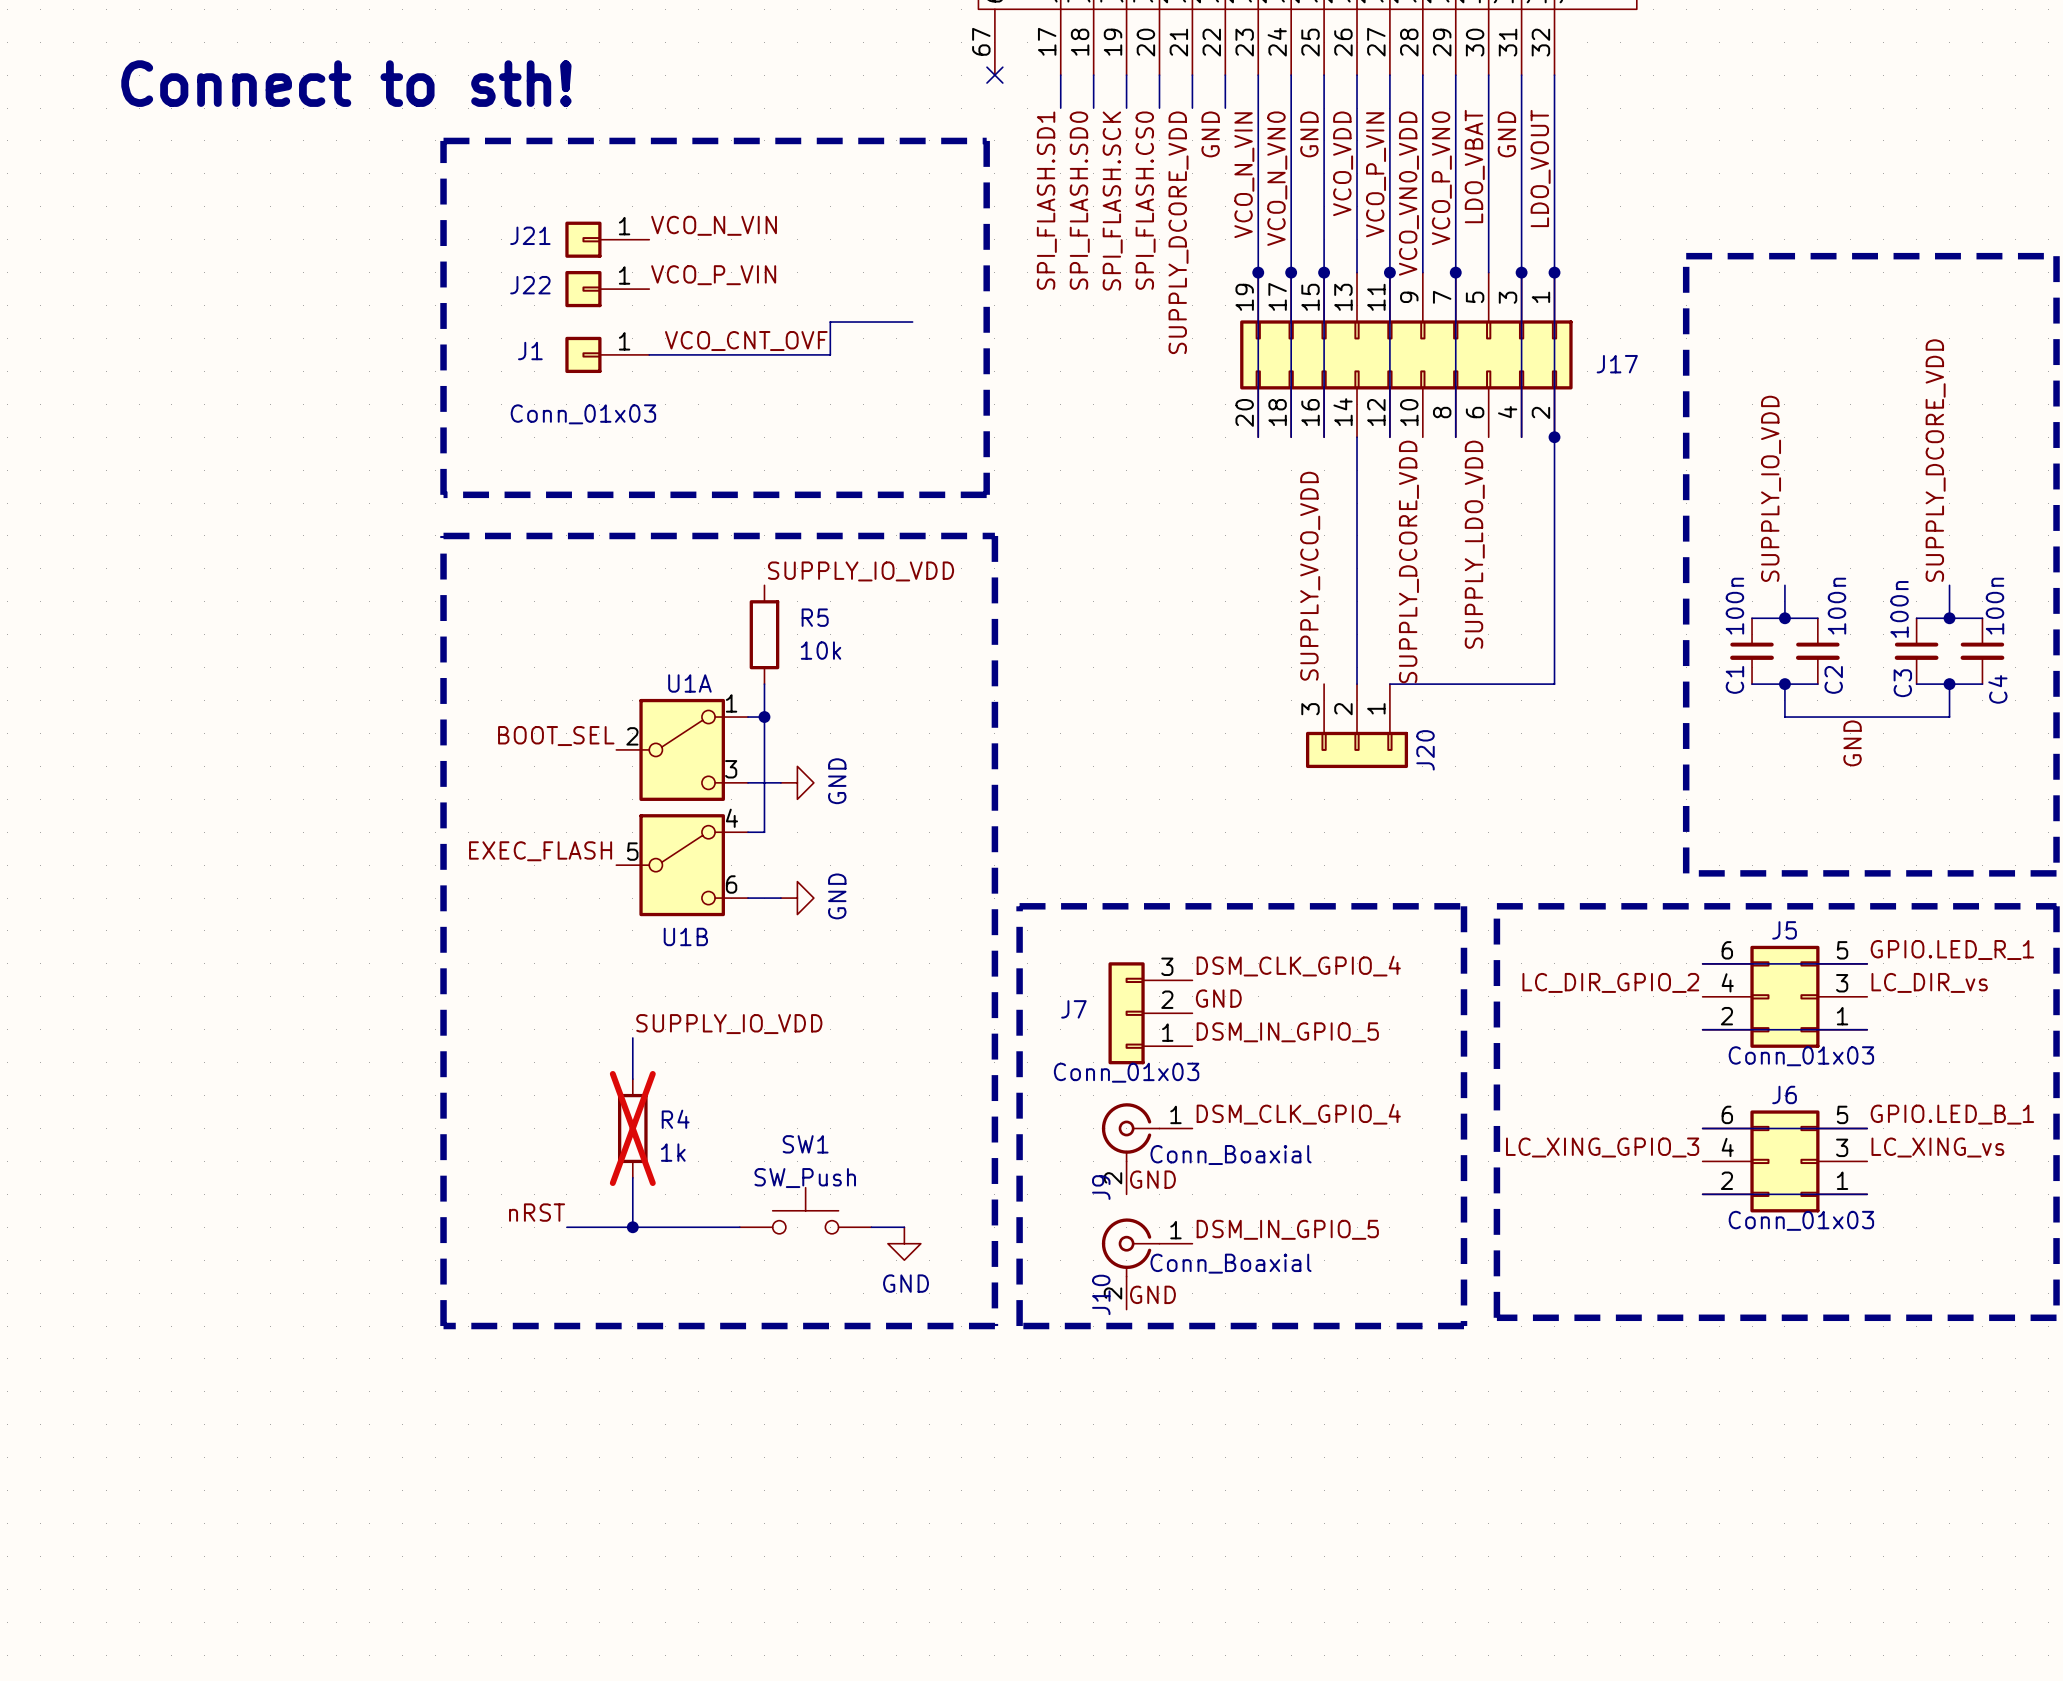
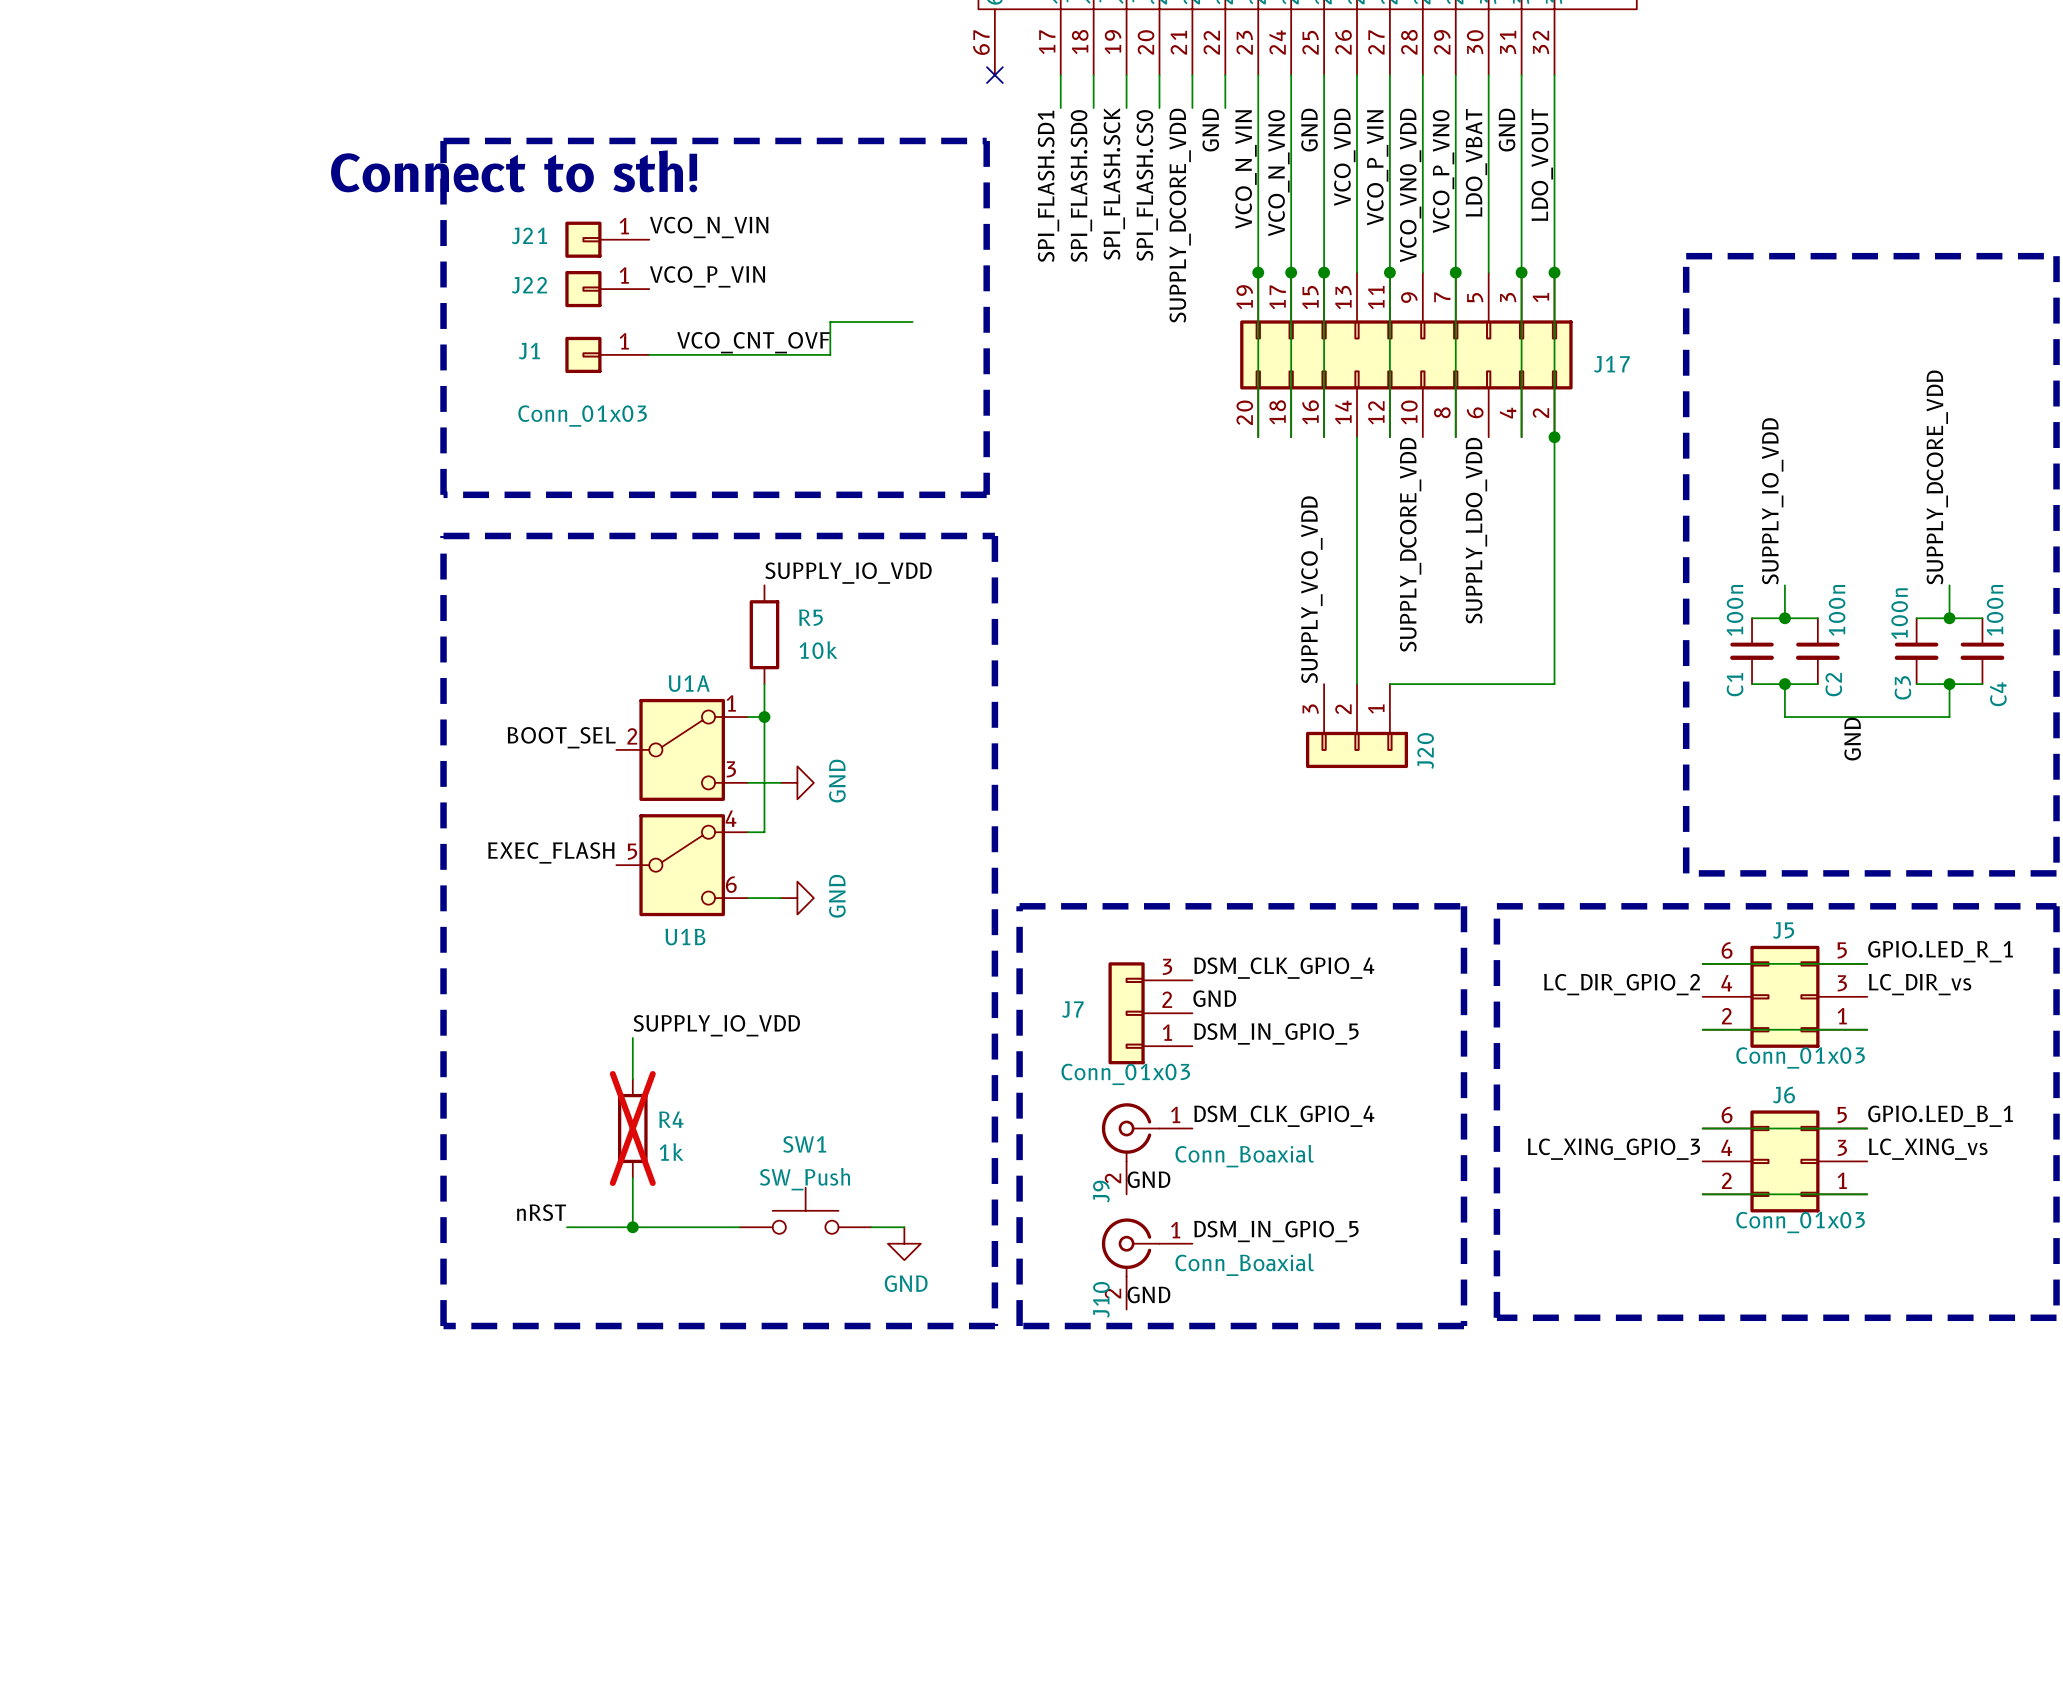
text position: Connect to sth! (346, 83) -> Connect to sth! (514, 171)

